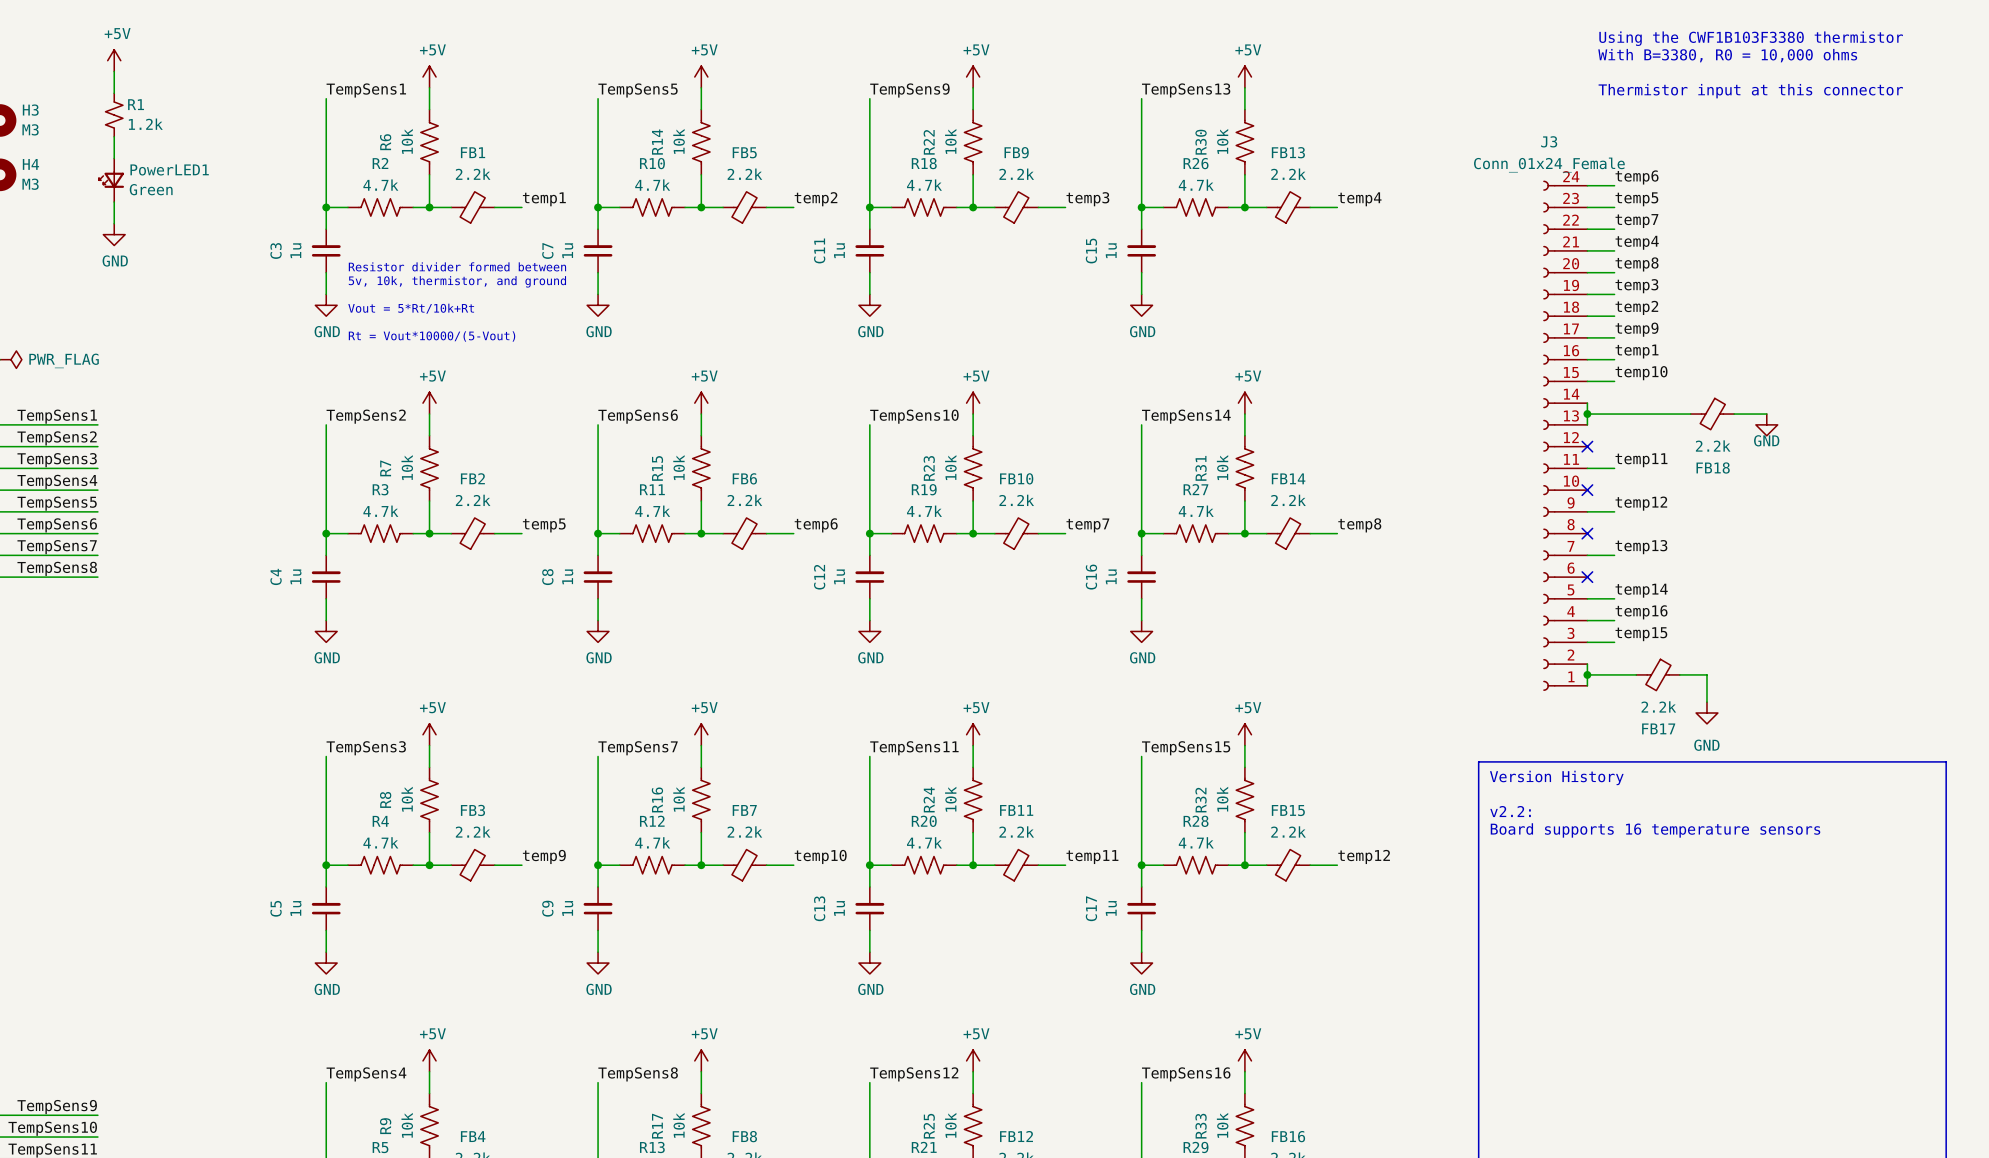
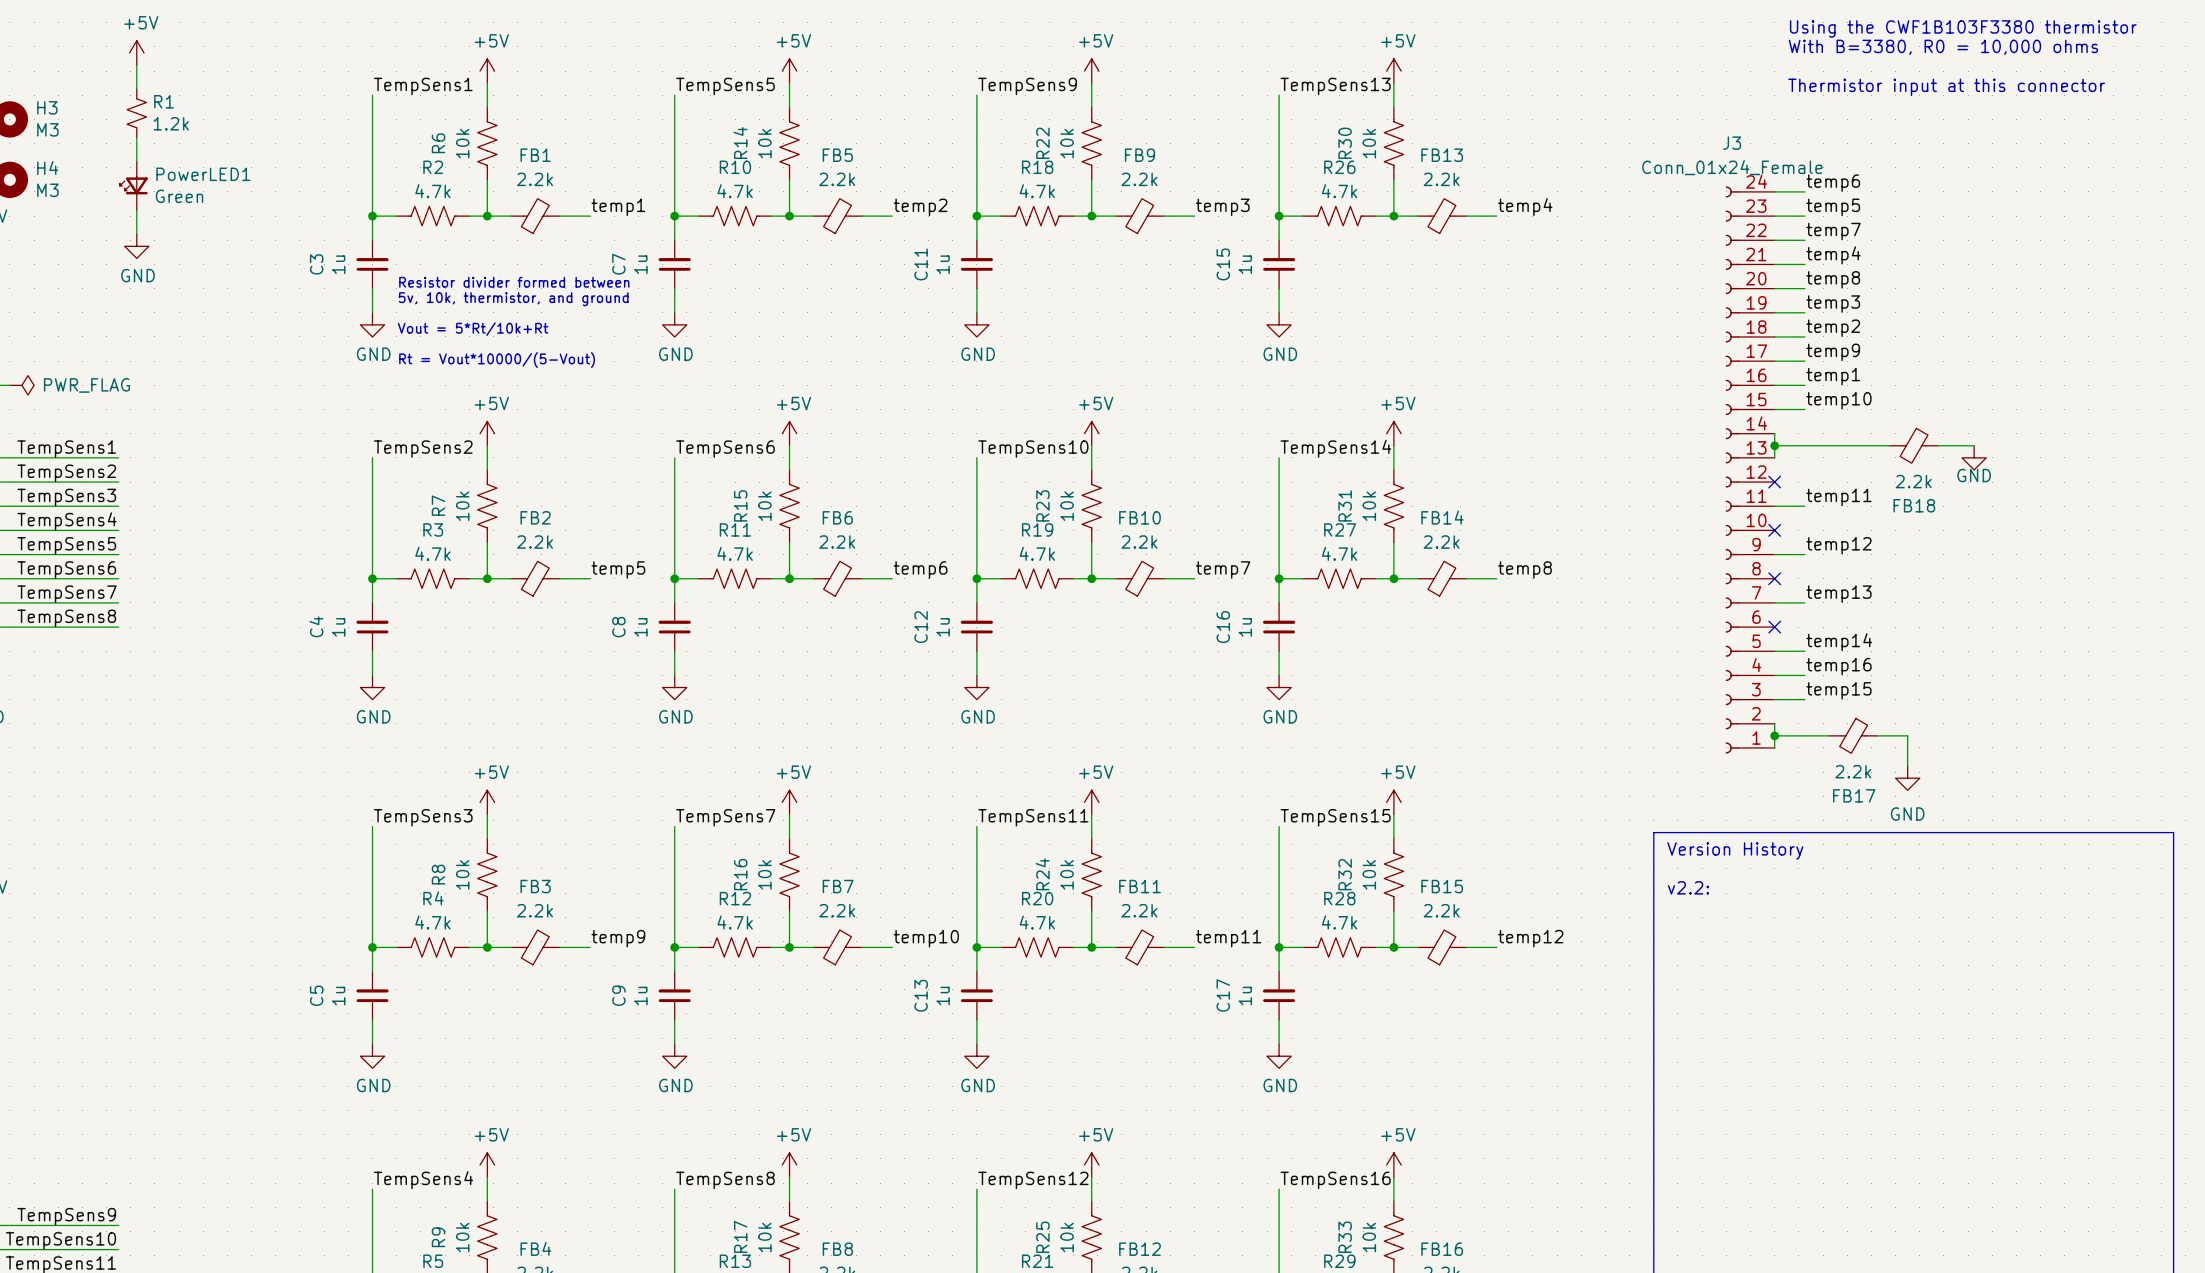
text: Board supports 16 temperature sensors (1655, 830) -> none

